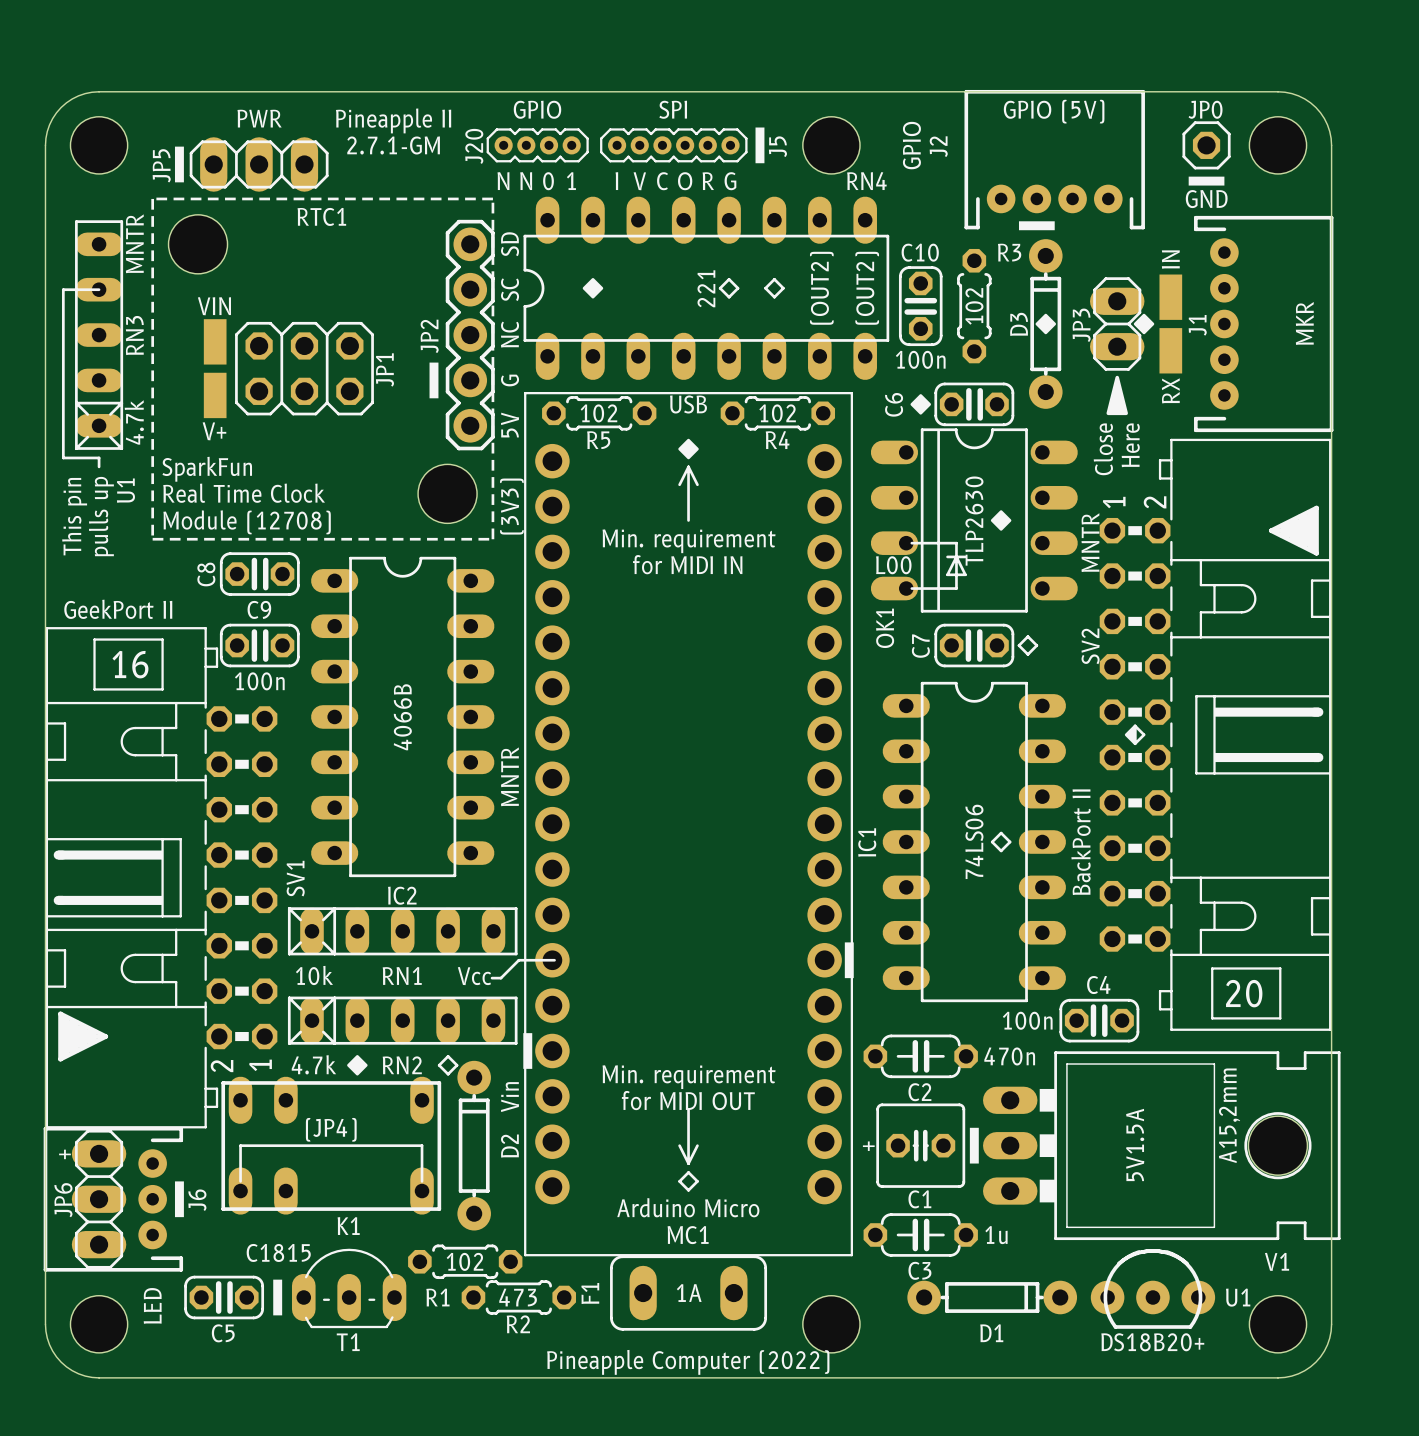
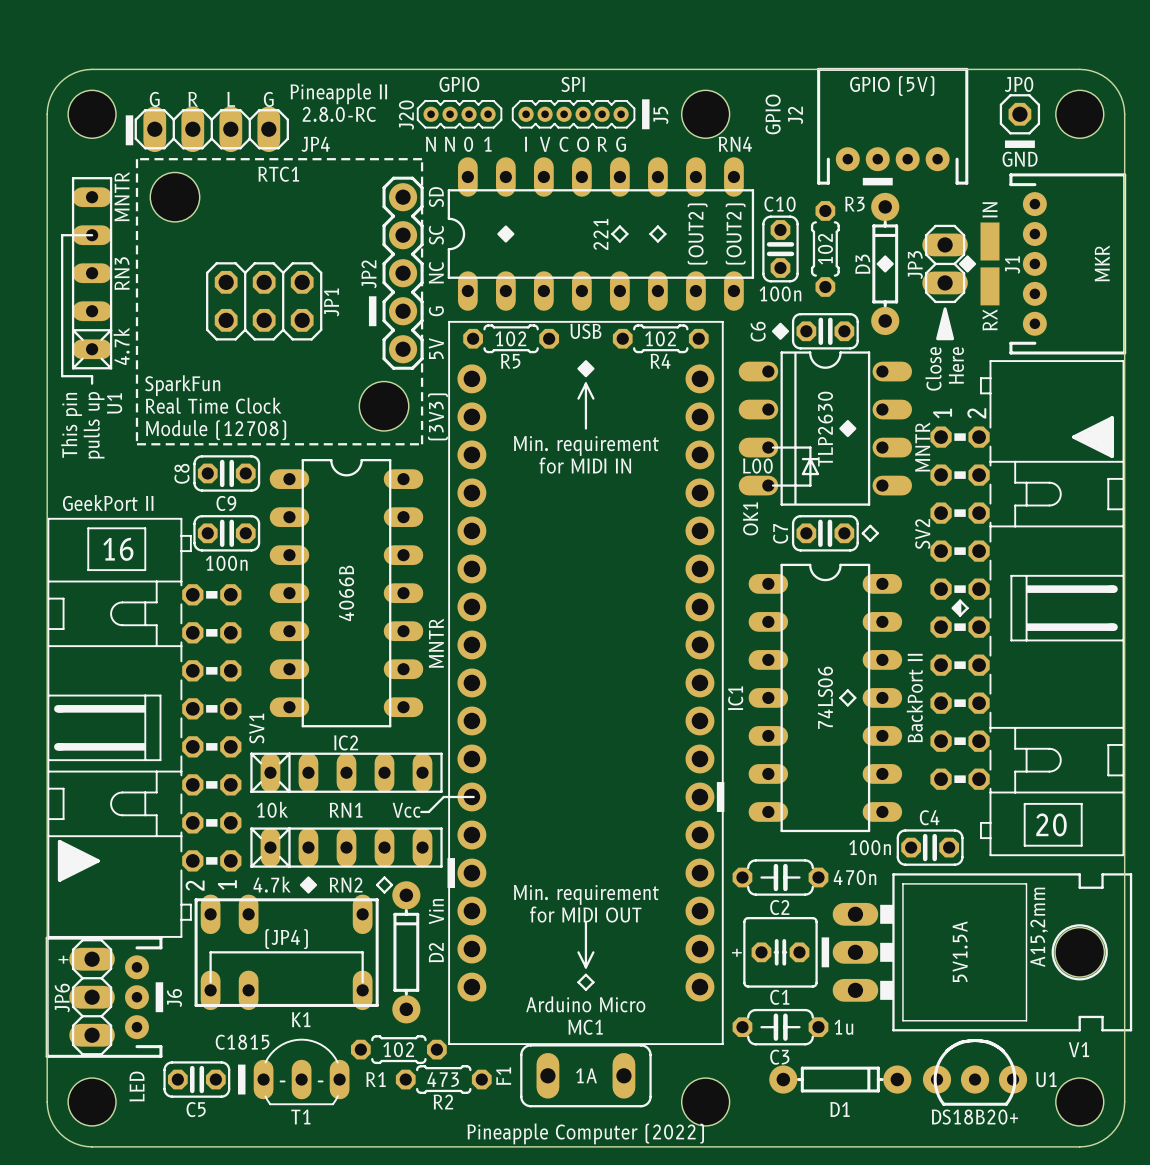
text: PWR (259, 118) -> L (231, 99)
text: none -> G (154, 99)
text: none -> R (193, 99)
text: none -> G (268, 99)
text: 2.7.1-GM (393, 145) -> 2.8.0-RC (339, 114)
JP4: none -> (211, 129)
drawing position: (179, 164) -> (129, 130)
JP5: (259, 164) -> none
VIN: (215, 341) -> none
V+: (215, 395) -> none

